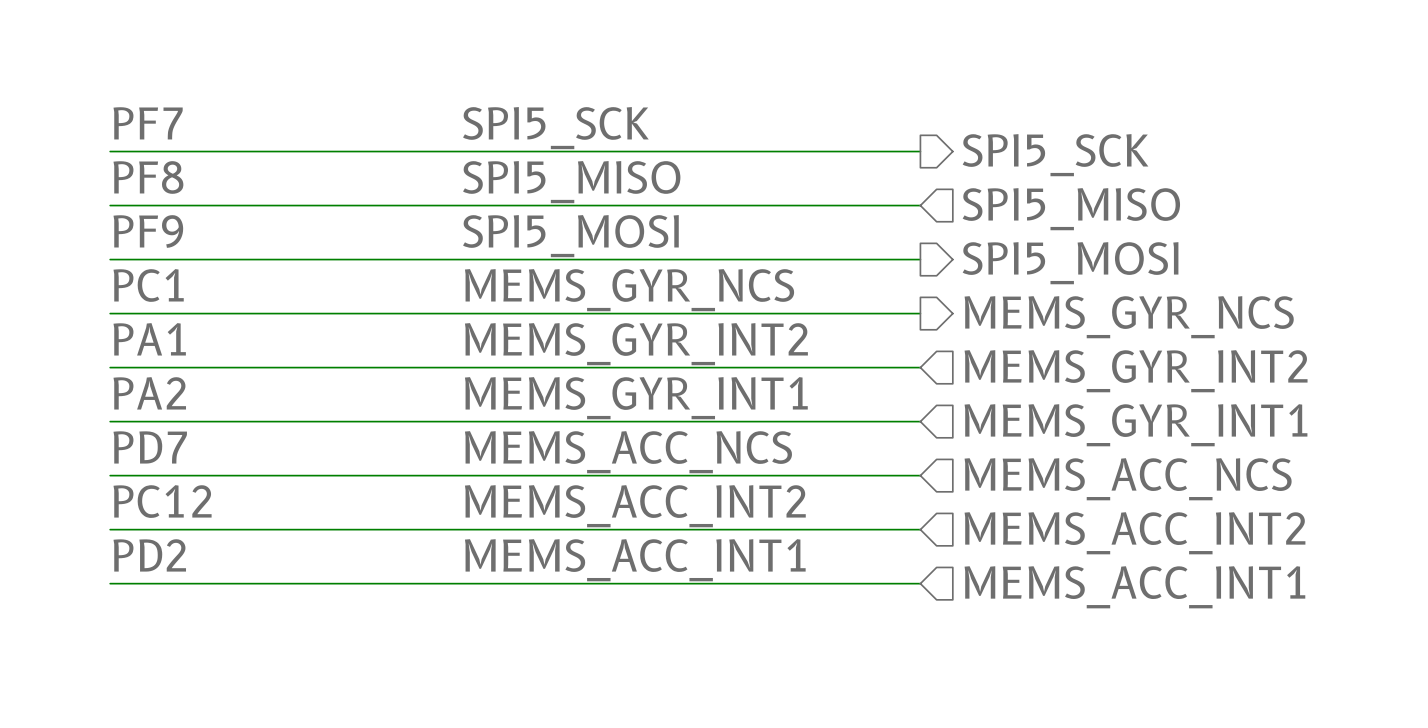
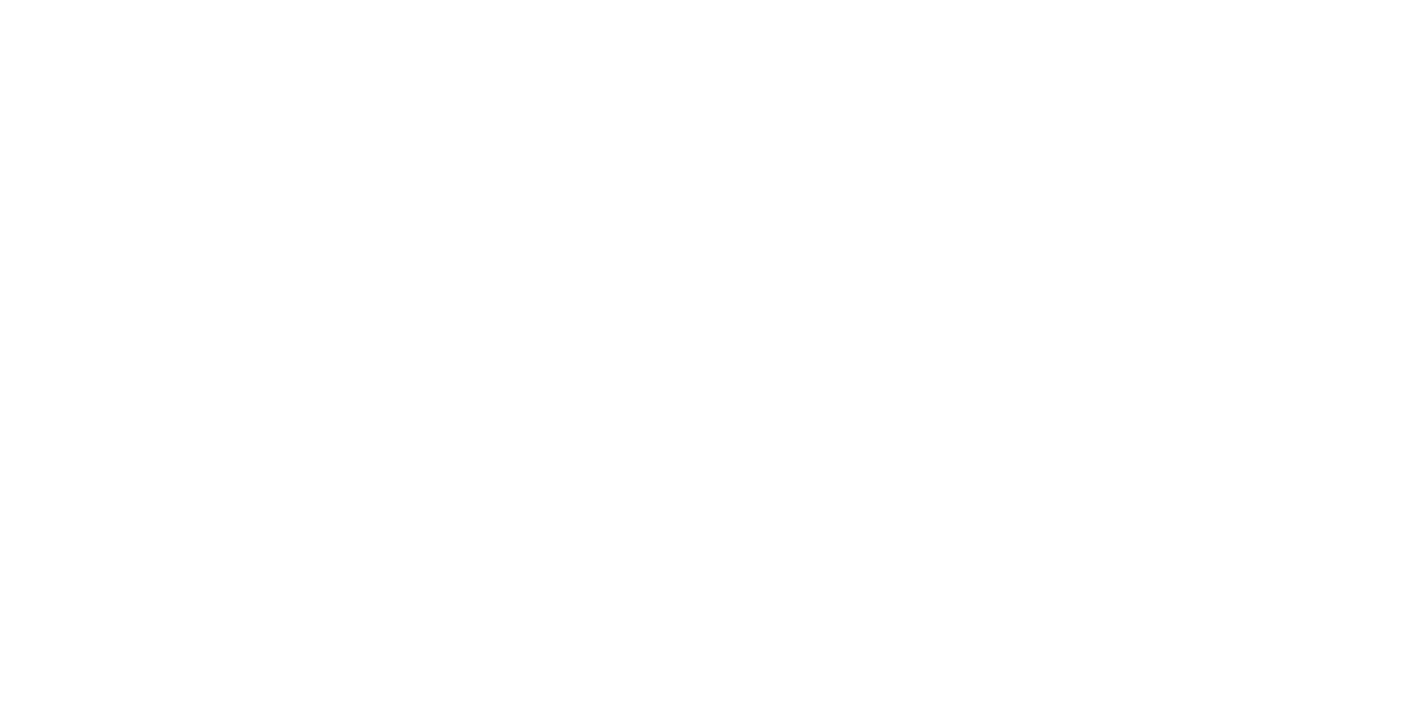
label: PF7 (148, 123) -> none
label: SPI5_SCK (555, 128) -> none
wire: (110, 151) (920, 151) -> none
hierarchical label: SPI5_SCK (1055, 155) -> none
label: PF8 (148, 177) -> none
label: SPI5_MISO (571, 182) -> none
wire: (110, 205) (920, 205) -> none
hierarchical label: SPI5_MISO (1071, 209) -> none
label: PF9 (148, 231) -> none
label: SPI5_MOSI (570, 236) -> none
wire: (110, 259) (920, 259) -> none
hierarchical label: SPI5_MOSI (1070, 263) -> none
label: PC1 (148, 285) -> none
label: MEMS_GYR_NCS (629, 290) -> none
wire: (110, 313) (920, 313) -> none
hierarchical label: MEMS_GYR_NCS (1129, 317) -> none
label: PA1 (149, 339) -> none
label: MEMS_GYR_INT2 (636, 344) -> none
wire: (110, 367) (920, 367) -> none
hierarchical label: MEMS_GYR_INT2 (1136, 371) -> none
label: PA2 (149, 393) -> none
label: MEMS_GYR_INT1 (636, 398) -> none
wire: (110, 421) (920, 421) -> none
hierarchical label: MEMS_GYR_INT1 (1136, 425) -> none
label: PD7 (150, 447) -> none
label: MEMS_ACC_NCS (628, 452) -> none
wire: (110, 475) (920, 475) -> none
hierarchical label: MEMS_ACC_NCS (1128, 479) -> none
label: PC12 (162, 501) -> none
label: MEMS_ACC_INT2 (635, 506) -> none
wire: (110, 529) (920, 529) -> none
hierarchical label: MEMS_ACC_INT2 (1135, 533) -> none
label: PD2 (149, 555) -> none
label: MEMS_ACC_INT1 (635, 560) -> none
wire: (110, 583) (920, 583) -> none
hierarchical label: MEMS_ACC_INT1 (1134, 587) -> none

